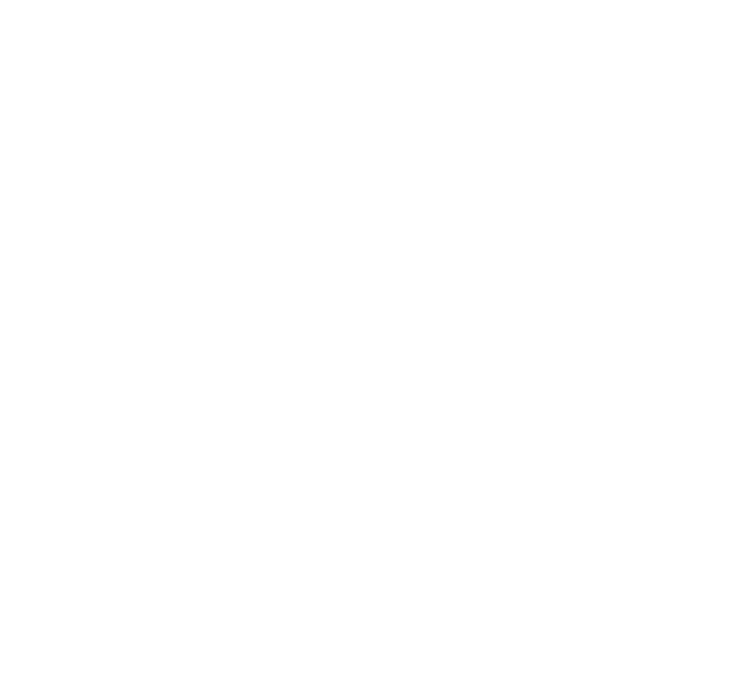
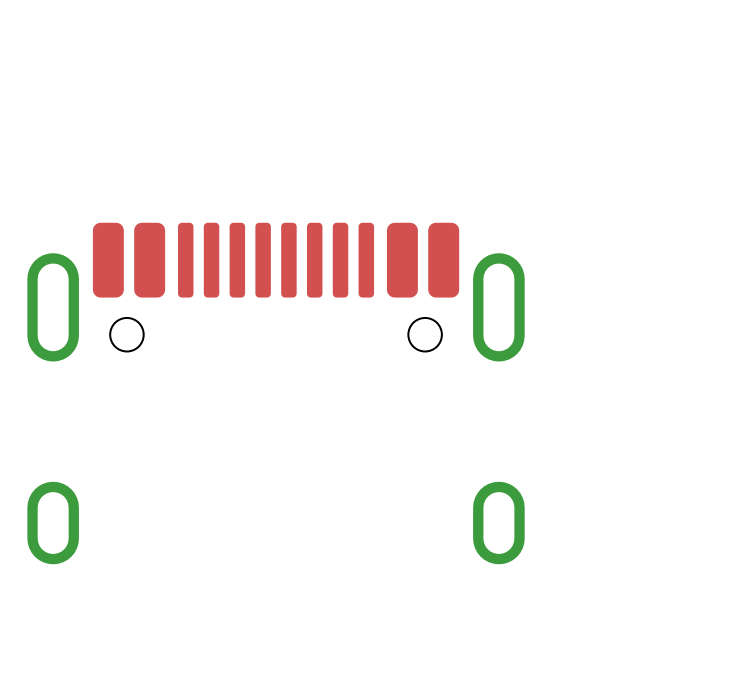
part: none -> (276, 393)

